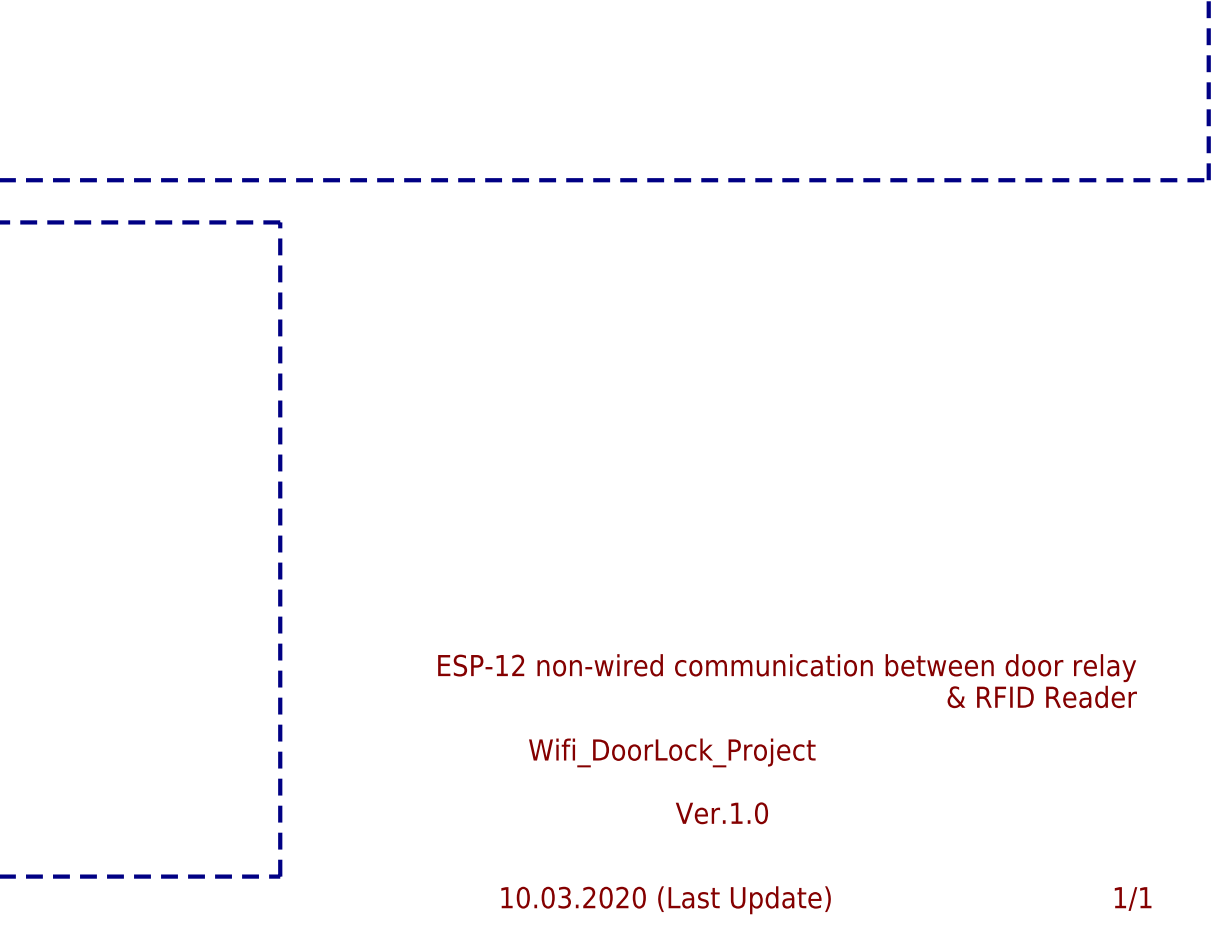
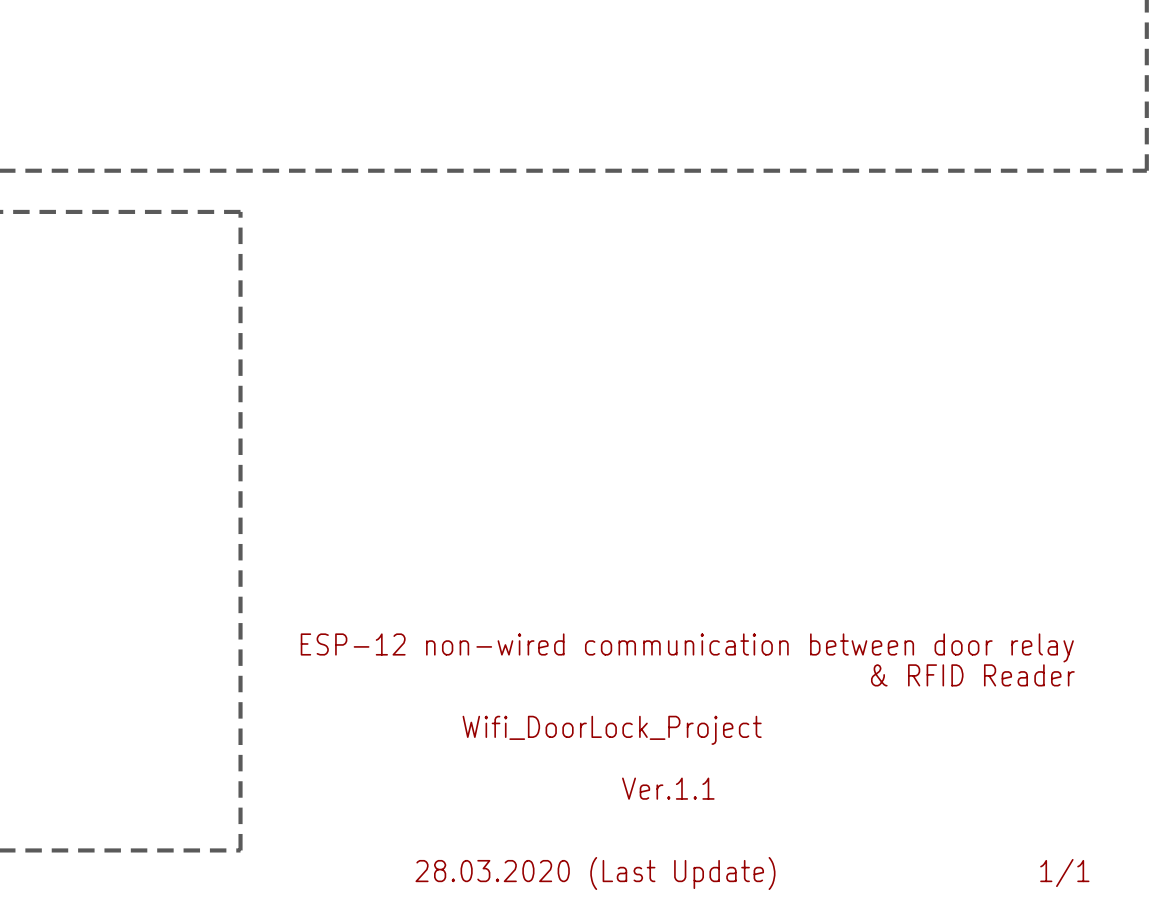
text: Ver.1.0 (721, 813) -> Ver.1.1 (668, 788)
text: 10.03.2020 (Last Update) (666, 900) -> 28.03.2020 (Last Update) (595, 873)

